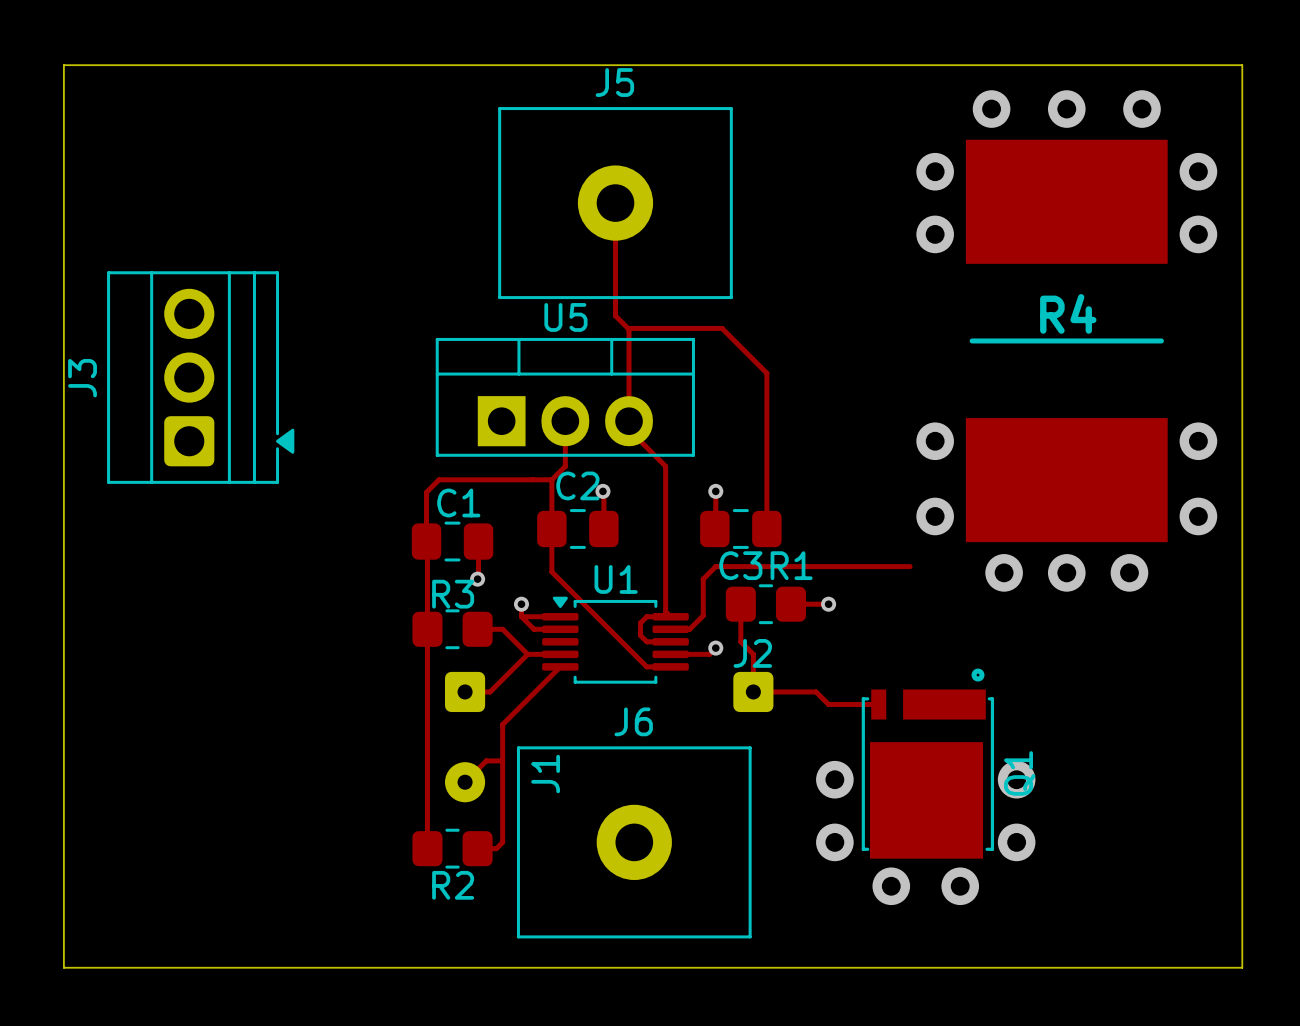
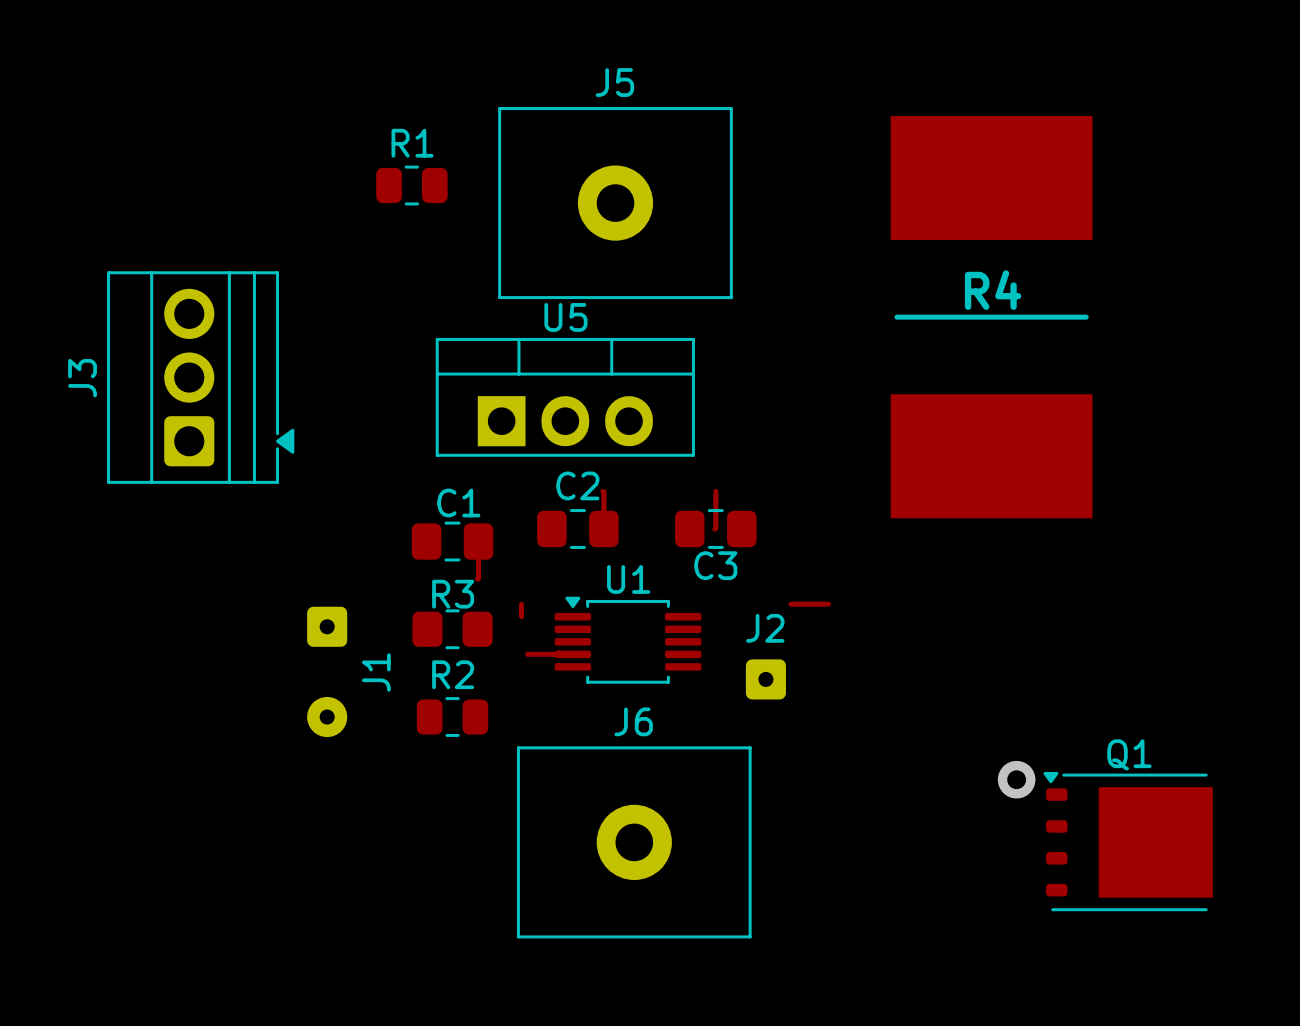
board edge: (63, 65) (1242, 65) (1242, 967) (63, 967) (63, 65) -> none
via: (991, 109) -> none
via: (1066, 109) -> none
via: (1142, 109) -> none
via: (935, 171) -> none
via: (1198, 171) -> none
top track: (615, 203) (615, 315) (629, 329) -> none
via: (935, 234) -> none
via: (1198, 234) -> none
top track: (629, 329) (722, 328) (766, 373) (766, 528) -> none
top track: (629, 329) (629, 429) (665, 466) (665, 611) (670, 616) (646, 616) (640, 623) (640, 635) (646, 641) (670, 641) -> none
R4 position: (1066, 340) -> (991, 317)
top track: (565, 421) (565, 466) (551, 479) -> none
via: (935, 441) -> none
via: (1198, 441) -> none
top track: (551, 479) (439, 479) (426, 492) (427, 848) -> none
top track: (551, 479) (551, 571) (646, 666) (670, 666) -> none
via: (602, 491) -> none
via: (715, 491) -> none
via: (935, 516) -> none
via: (1198, 516) -> none
C3 position: (740, 528) -> (715, 528)
top track: (910, 566) (715, 566) (703, 579) (703, 615) (689, 629) (670, 629) -> none
via: (1004, 572) -> none
via: (1066, 572) -> none
via: (1129, 572) -> none
via: (477, 579) -> none
R1 footprint: [725, 584, 807, 625] -> [376, 165, 448, 206]
via: (521, 604) -> none
top track: (740, 604) (740, 641) (753, 654) (753, 691) (816, 691) (828, 704) (878, 704) -> none
via: (828, 604) -> none
top track: (560, 616) (521, 616) (534, 629) (560, 629) -> none
top track: (477, 629) (502, 629) (527, 654) (490, 691) (465, 691) -> none
U1 position: (615, 640) -> (628, 640)
top track: (715, 648) (709, 654) (670, 654) -> none
via: (715, 648) -> none
J2 name position: J2 (752, 653) -> J2 (765, 628)
top track: (560, 666) (502, 724) (502, 842) (496, 848) (477, 848) -> none
Q1 footprint: [861, 668, 995, 859] -> [1043, 771, 1213, 912]
J2 position: (753, 691) -> (765, 679)
J1 position: (465, 737) -> (327, 671)
top track: (502, 760) (486, 760) (465, 782) -> none
Q1 name position: Q1 (1019, 773) -> Q1 (1129, 754)
J1 name position: J1 (545, 774) -> J1 (376, 672)
via: (834, 779) -> none
R2 footprint: [412, 828, 493, 869] -> [416, 697, 489, 737]
via: (834, 842) -> none
via: (1016, 842) -> none
R2 name position: R2 (453, 885) -> R2 (453, 674)
via: (891, 886) -> none
via: (960, 886) -> none

